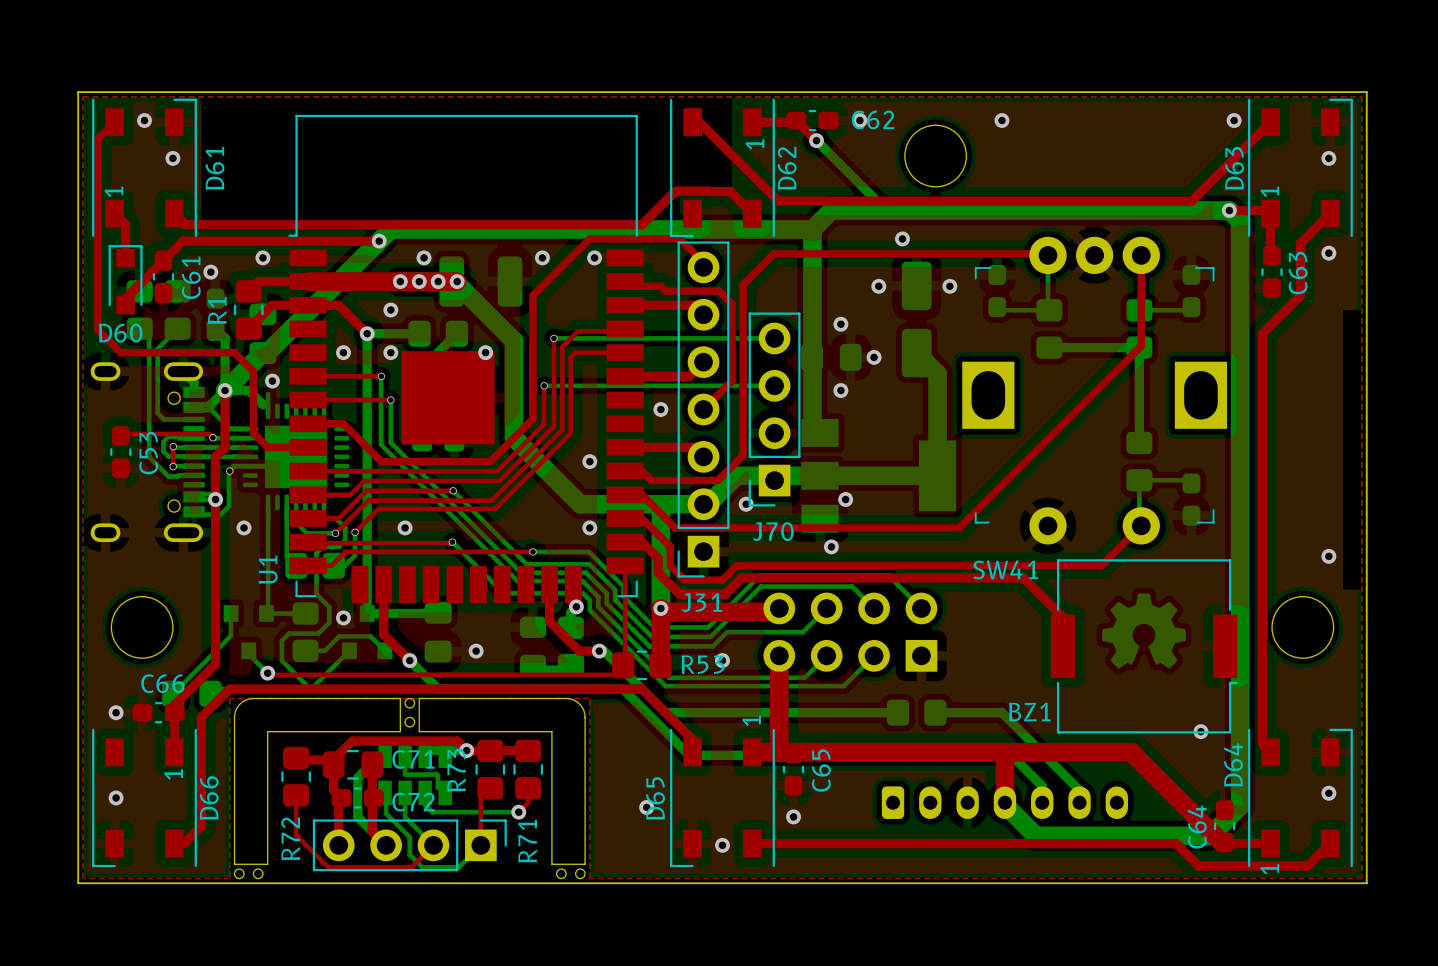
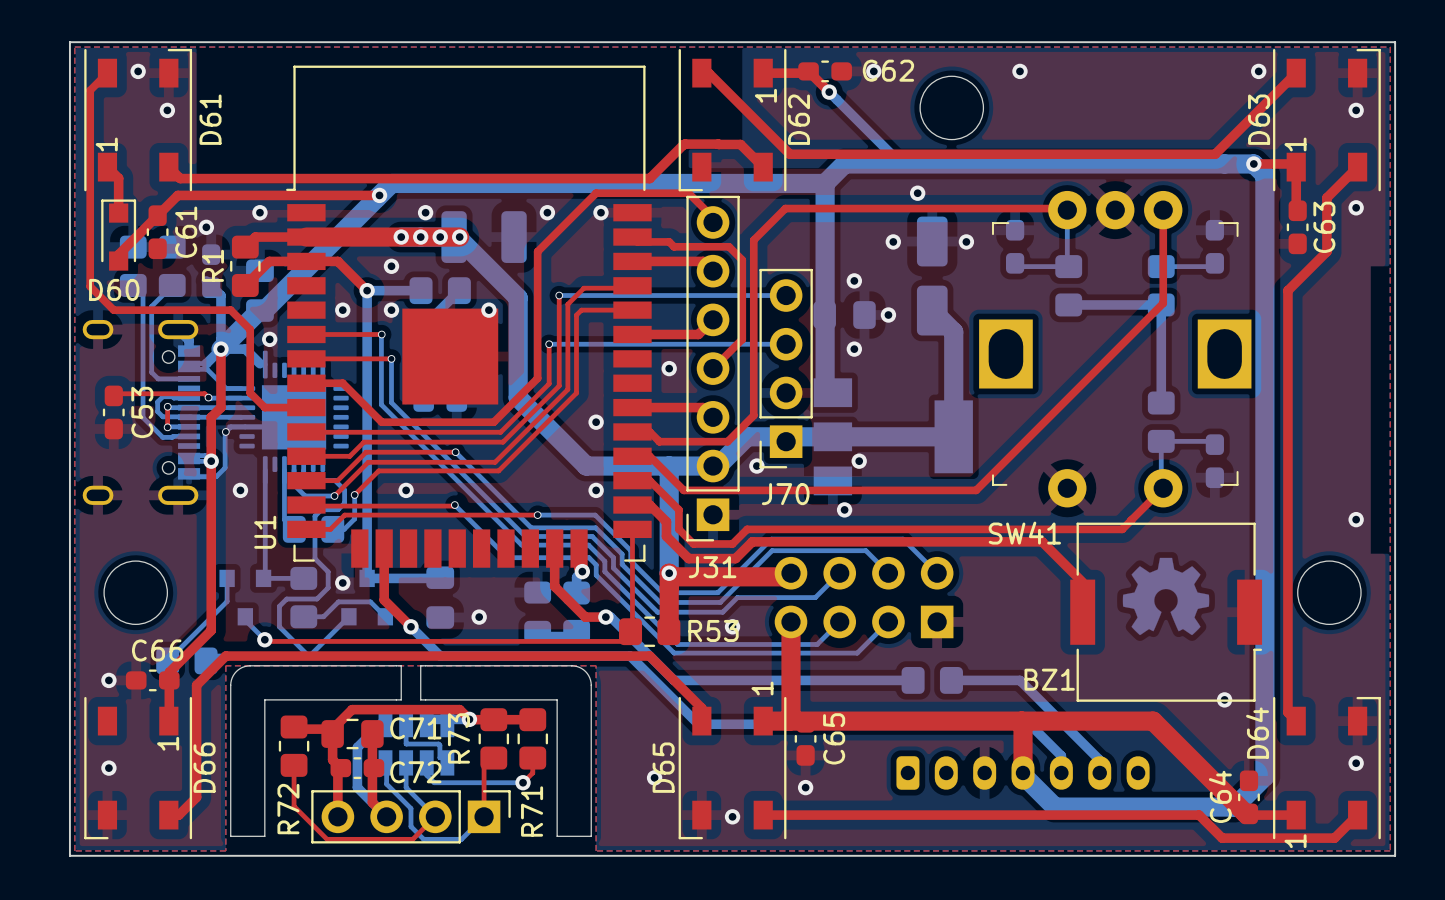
round board edge: [404, 698, 416, 709] -> none
round board edge: [404, 716, 416, 728] -> none
round board edge: [234, 868, 245, 879] -> none
round board edge: [253, 868, 264, 879] -> none
round board edge: [556, 868, 567, 879] -> none
round board edge: [575, 868, 586, 879] -> none

